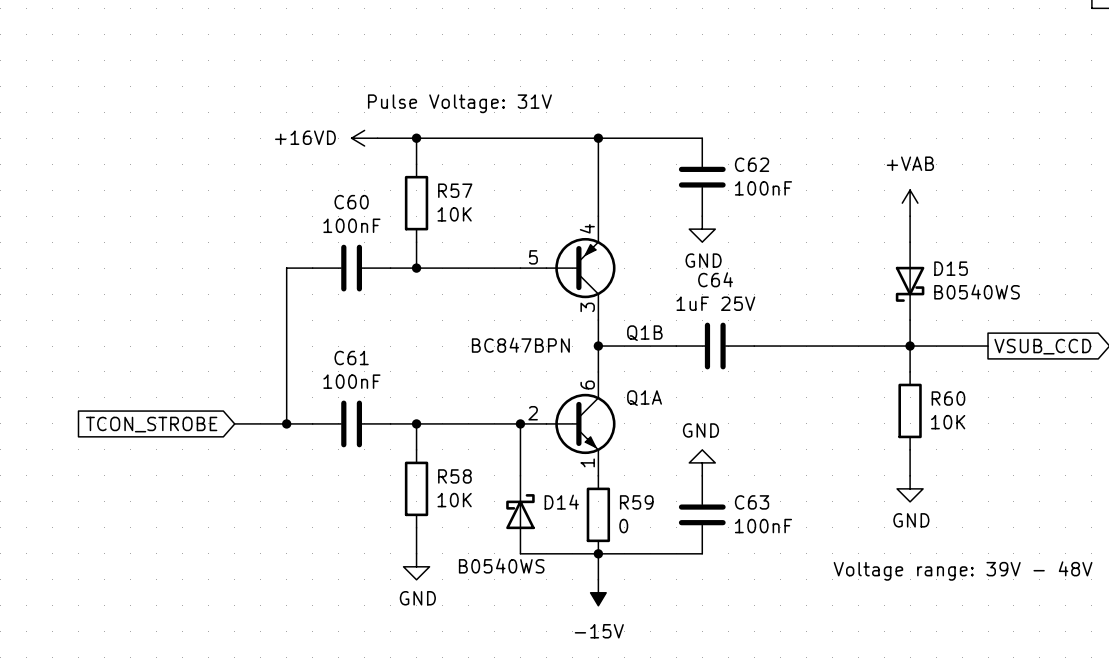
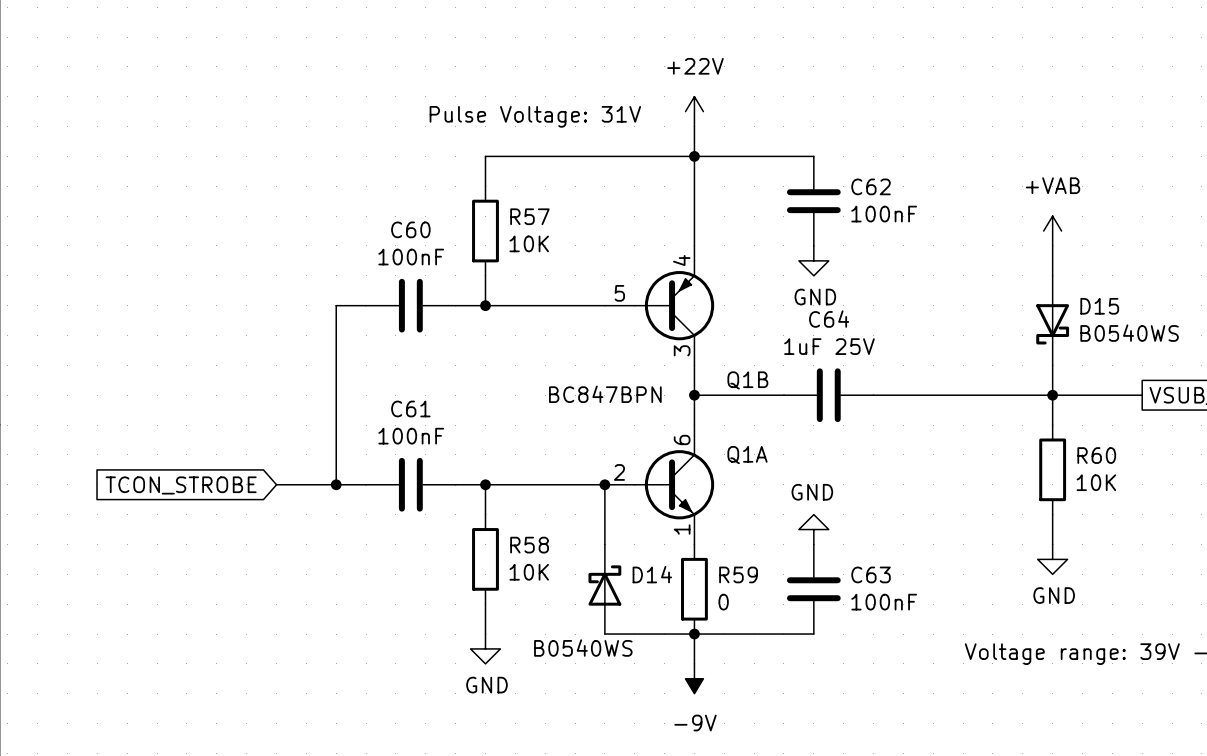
power symbol: none -> +22V (694, 111)
wire: none -> (694, 126) (694, 156)
power symbol: +16VD (364, 138) -> none
wire: (377, 138) (416, 138) -> none
junction: (416, 138) -> none
power symbol: -15V (598, 592) -> -9V (694, 678)

